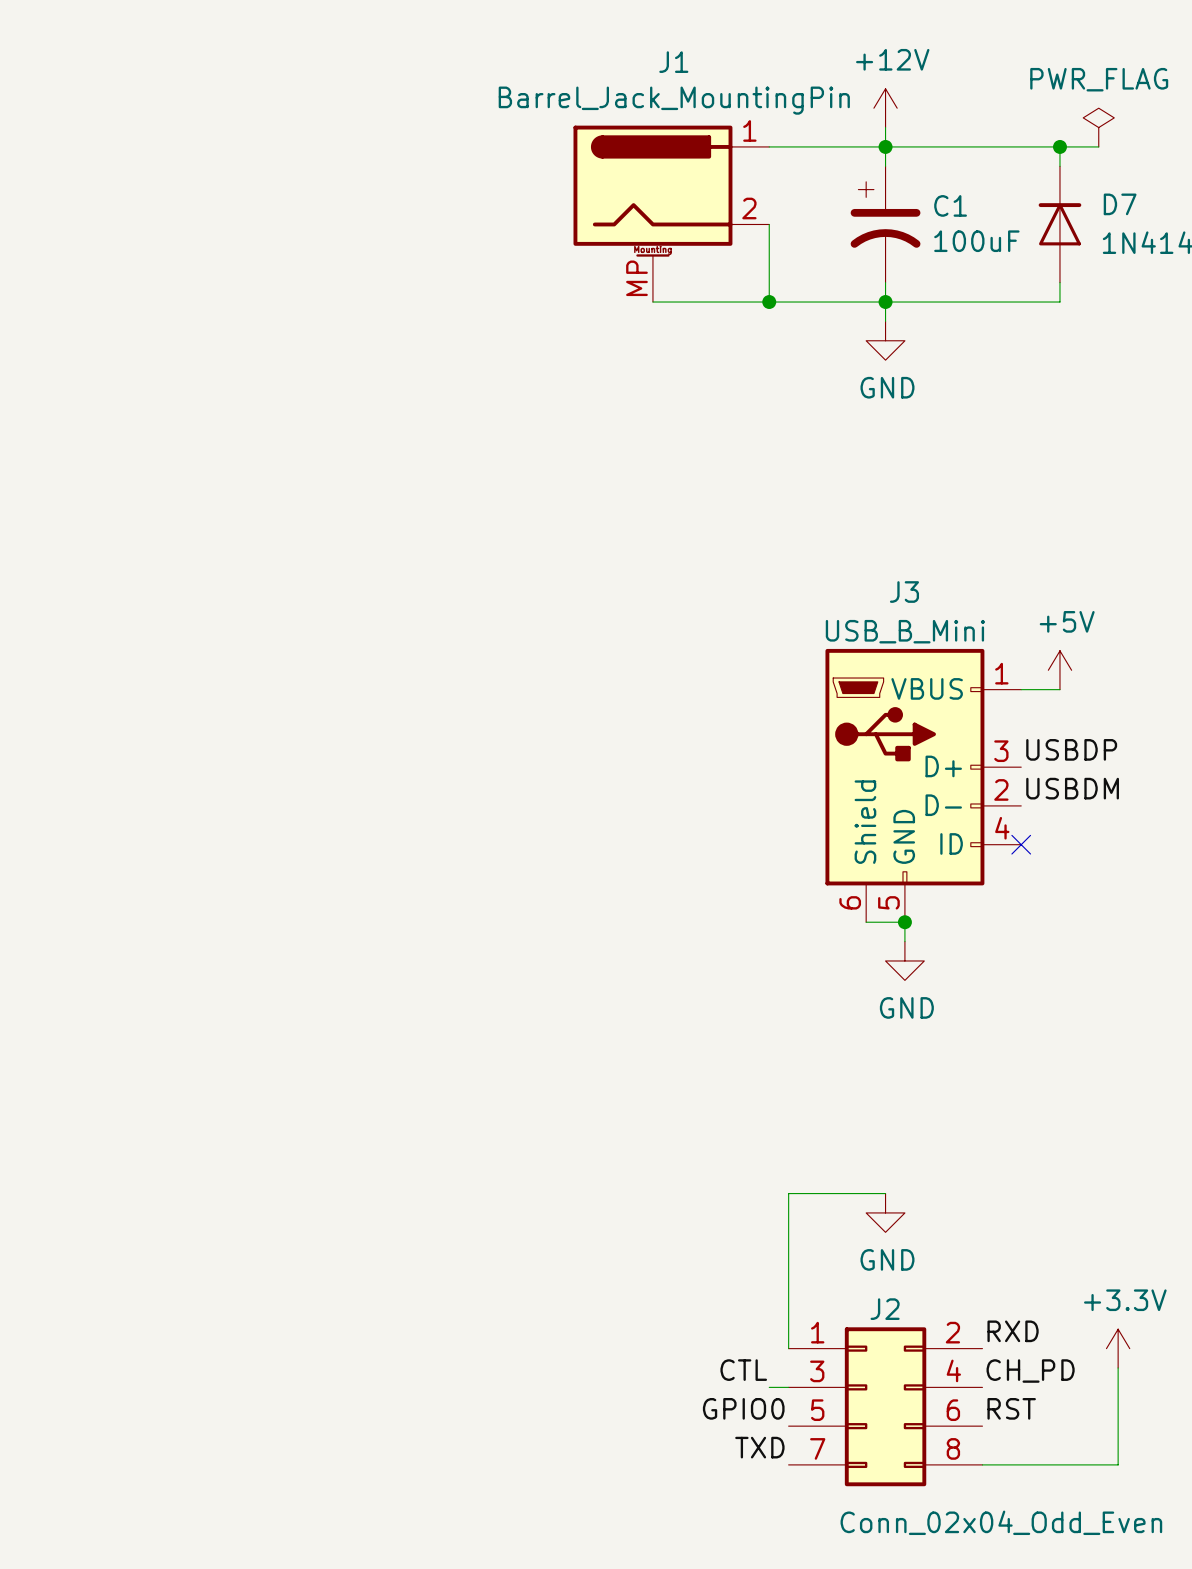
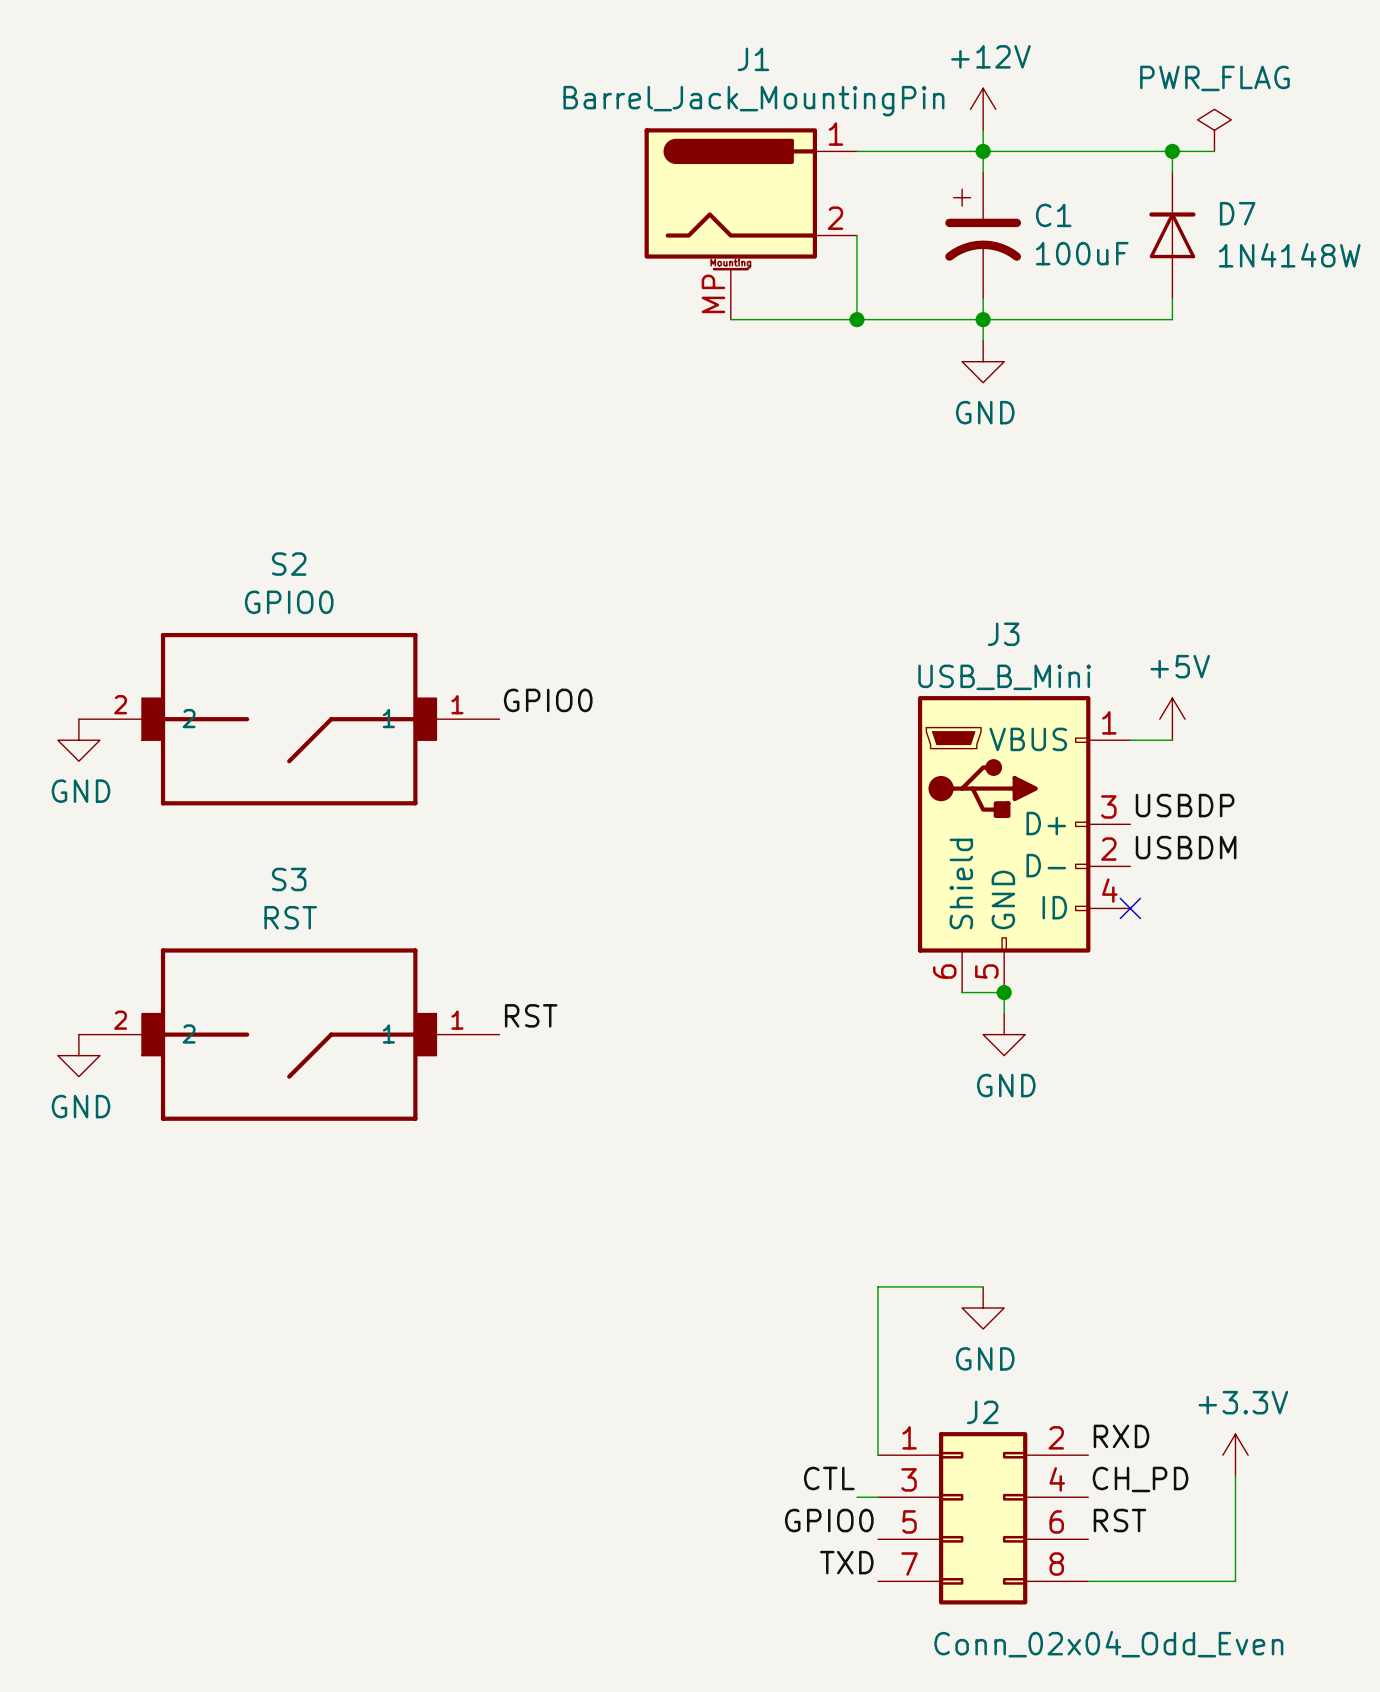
label: none -> GPIO0 (548, 700)
S2: none -> GPIO0 (289, 719)
power symbol: none -> GND (78, 740)
label: none -> RST (531, 1015)
S3: none -> RST (289, 1034)
power symbol: none -> GND (78, 1055)

